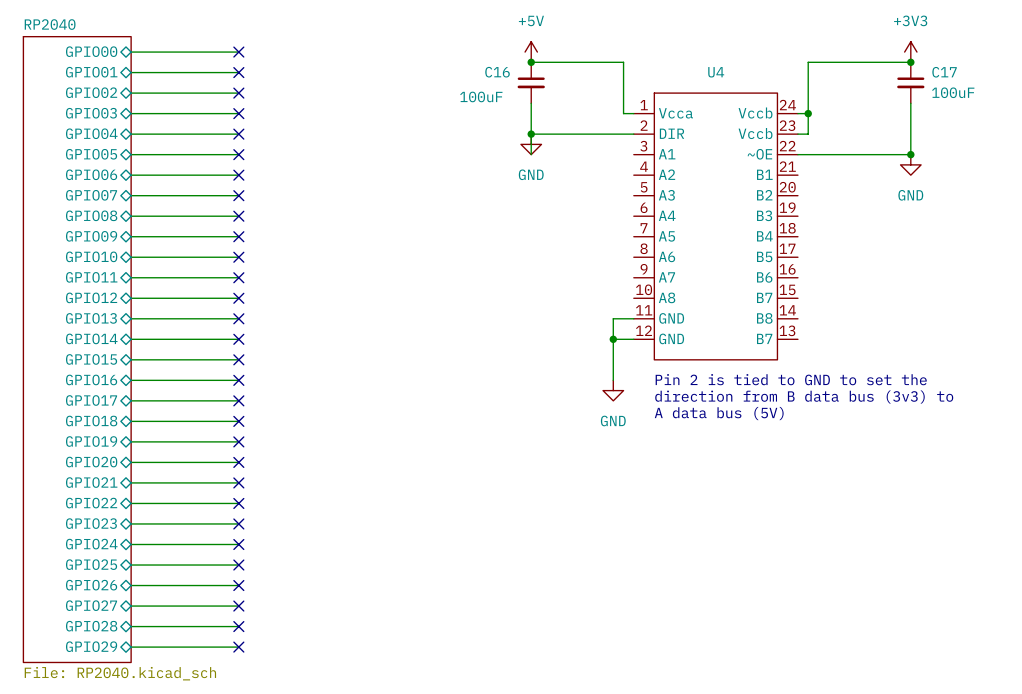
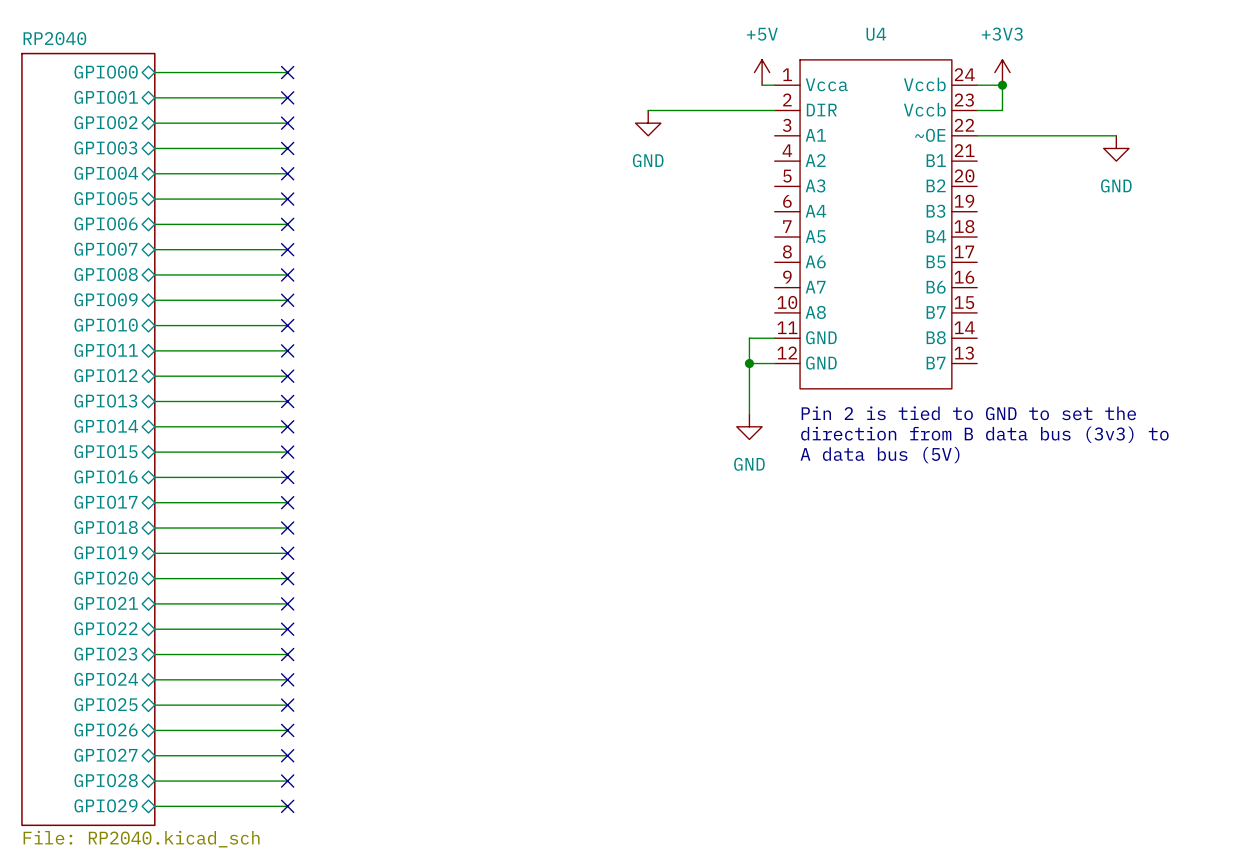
power symbol position: +5V (531, 52) -> +5V (762, 72)
power symbol position: +3V3 (910, 52) -> +3V3 (1002, 72)
wire: (531, 62) (623, 62) (623, 113) (633, 113) -> none
junction: (531, 62) -> none
wire: (808, 62) (808, 134) (797, 134) -> (989, 85) (977, 85)
wire: (818, 62) (910, 62) -> (1002, 85) (1002, 110) (977, 110)
junction: none -> (1002, 85)
junction: (910, 62) -> none
C16: 100uF (531, 82) -> none
C17: 100uF (910, 82) -> none
wire: (531, 103) (531, 154) -> none
wire: (910, 103) (910, 154) (797, 154) -> (1116, 135) (977, 135)
wire: (797, 113) (808, 113) -> (762, 85) (774, 85)
junction: (808, 113) -> none
wire: (531, 134) (633, 134) -> (648, 110) (774, 110)
junction: (531, 134) -> none
power symbol position: GND (531, 144) -> GND (648, 123)
junction: (910, 154) -> none
power symbol position: GND (910, 164) -> GND (1116, 148)
U4 position: (715, 226) -> (875, 224)
junction: none -> (749, 363)
wire: (613, 318) (633, 318) -> (749, 401) (749, 338) (774, 338)
wire: (613, 329) (613, 380) -> none
wire: (613, 339) (633, 339) -> (749, 363) (774, 363)
junction: (613, 339) -> none
text position: Pin 2 is tied to GND to set the (791, 379) -> Pin 2 is tied to GND to set the (968, 413)
power symbol position: GND (613, 390) -> GND (749, 426)
text position: direction from B data bus (3v3) to (804, 397) -> direction from B data bus (3v3) to (984, 434)
text position: A data bus (5V) (719, 413) -> A data bus (5V) (880, 455)

